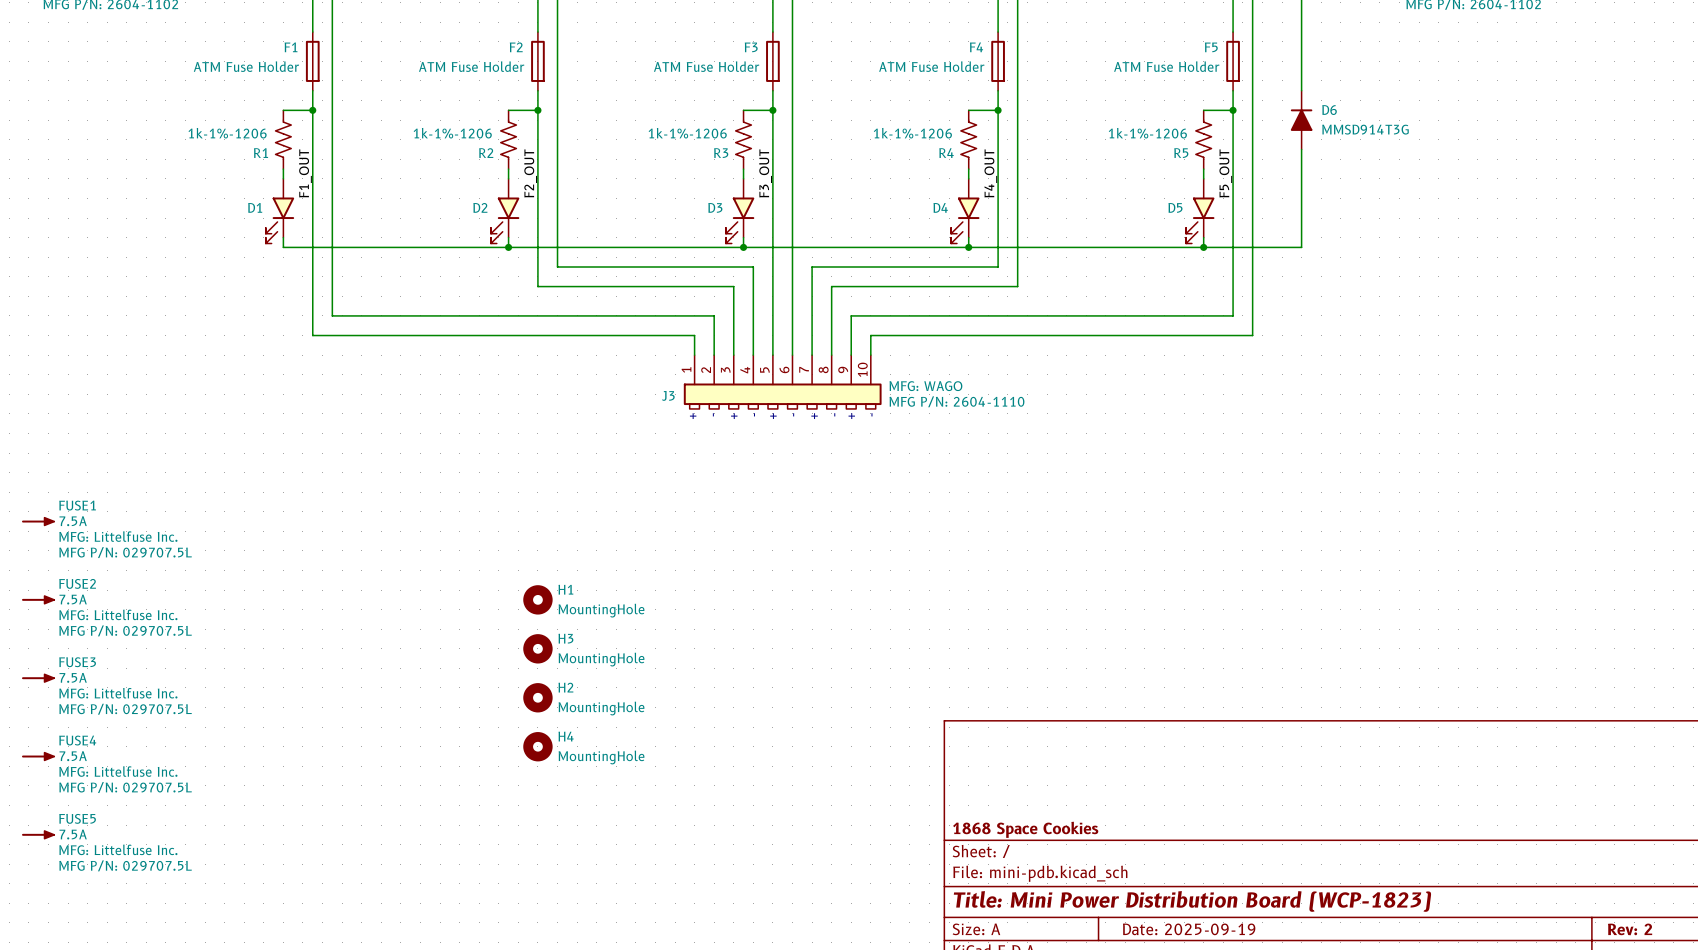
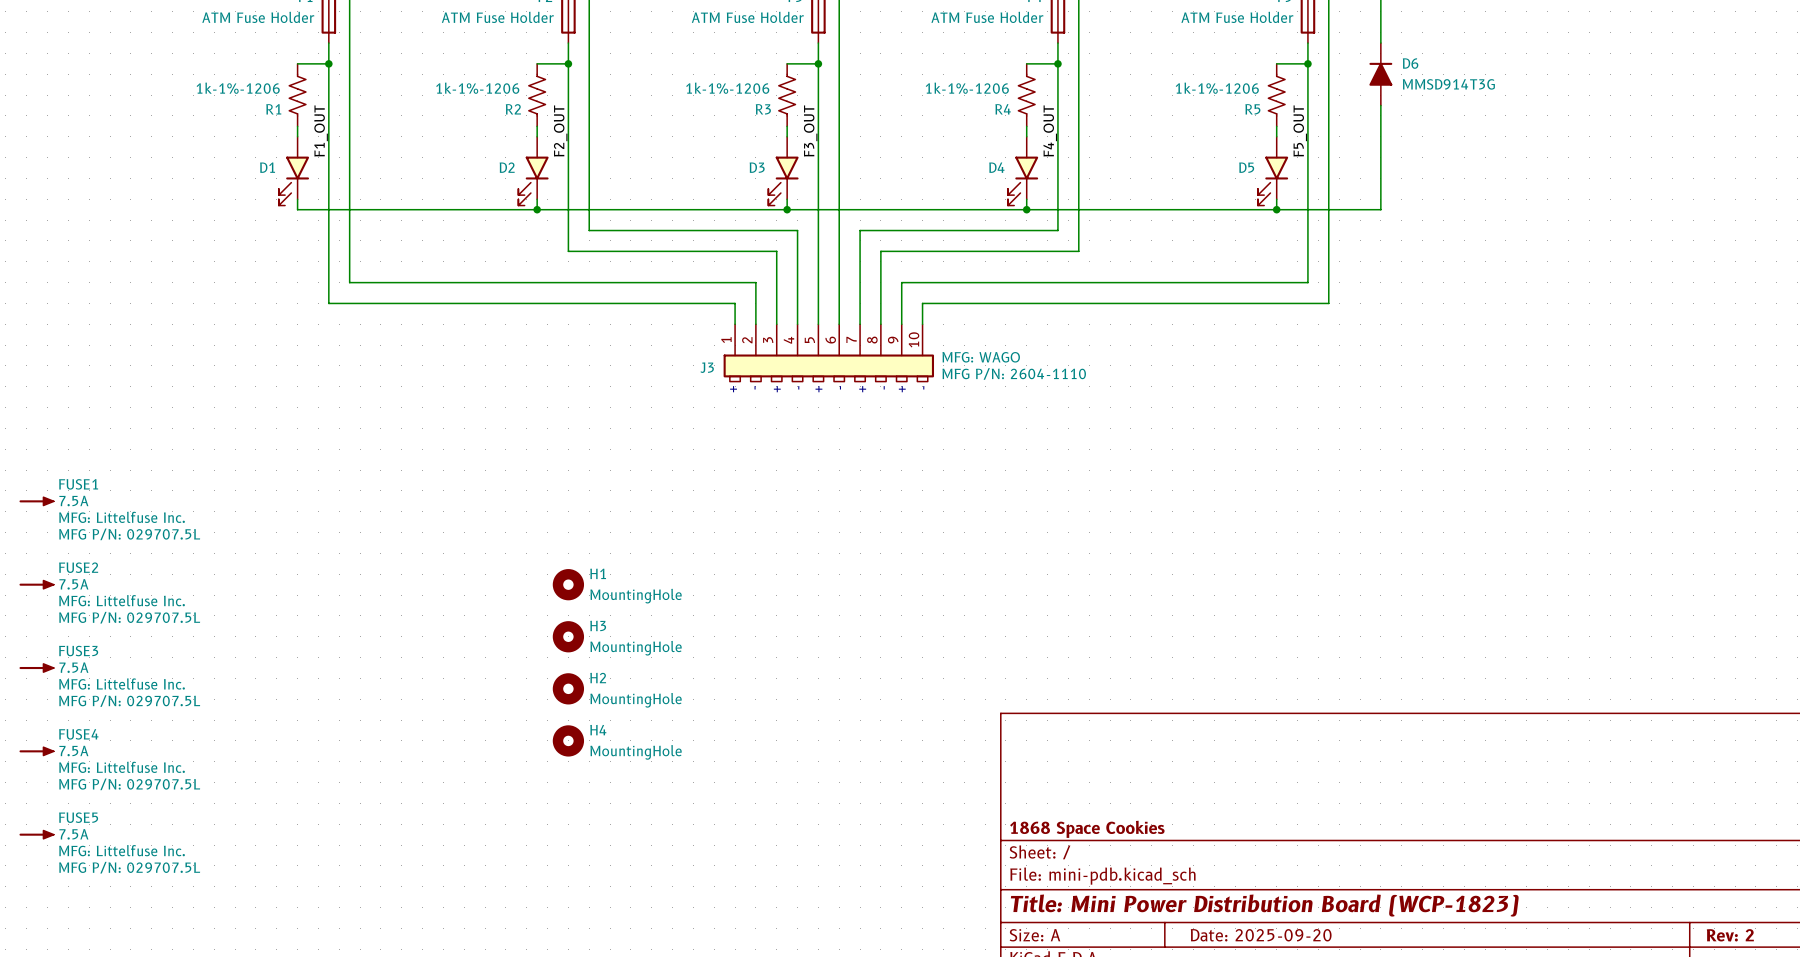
title block: Date: 2025-09-19 (1189, 929) -> Date: 2025-09-20 (1261, 935)

